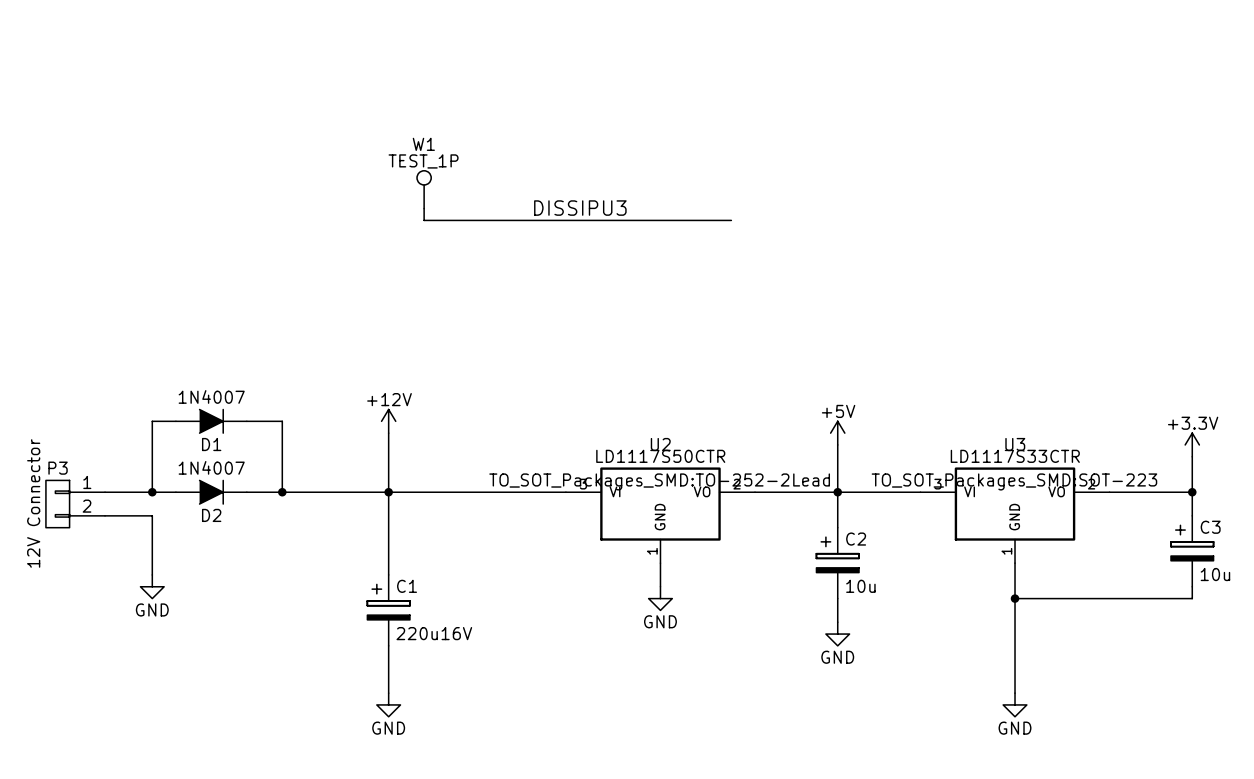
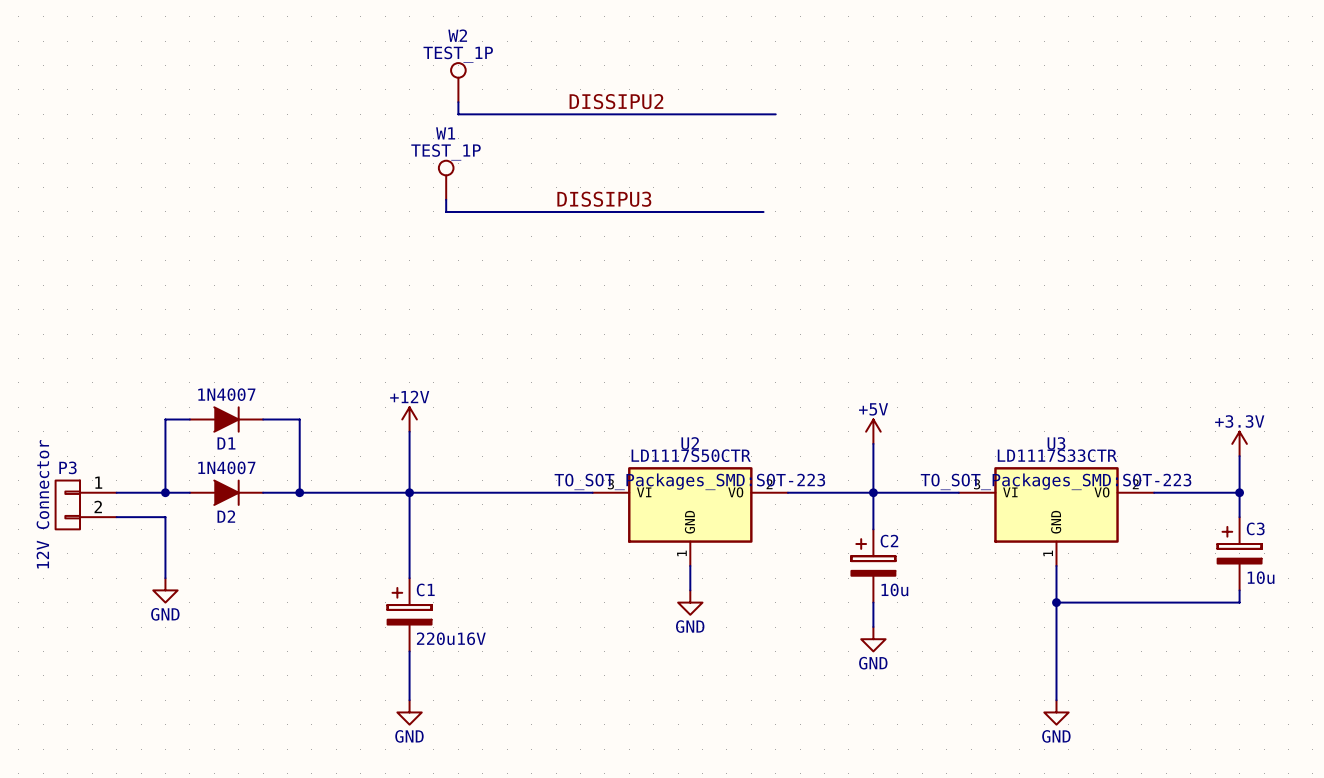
W2: none -> TEST_1P (458, 82)
label: none -> DISSIPU2 (616, 101)
wire: none -> (458, 102) (458, 114) (775, 114)
U2 text: TO_SOT_Packages_SMD:TO-252-2Lead (659, 481) -> TO_SOT_Packages_SMD:SOT-223 (689, 481)

